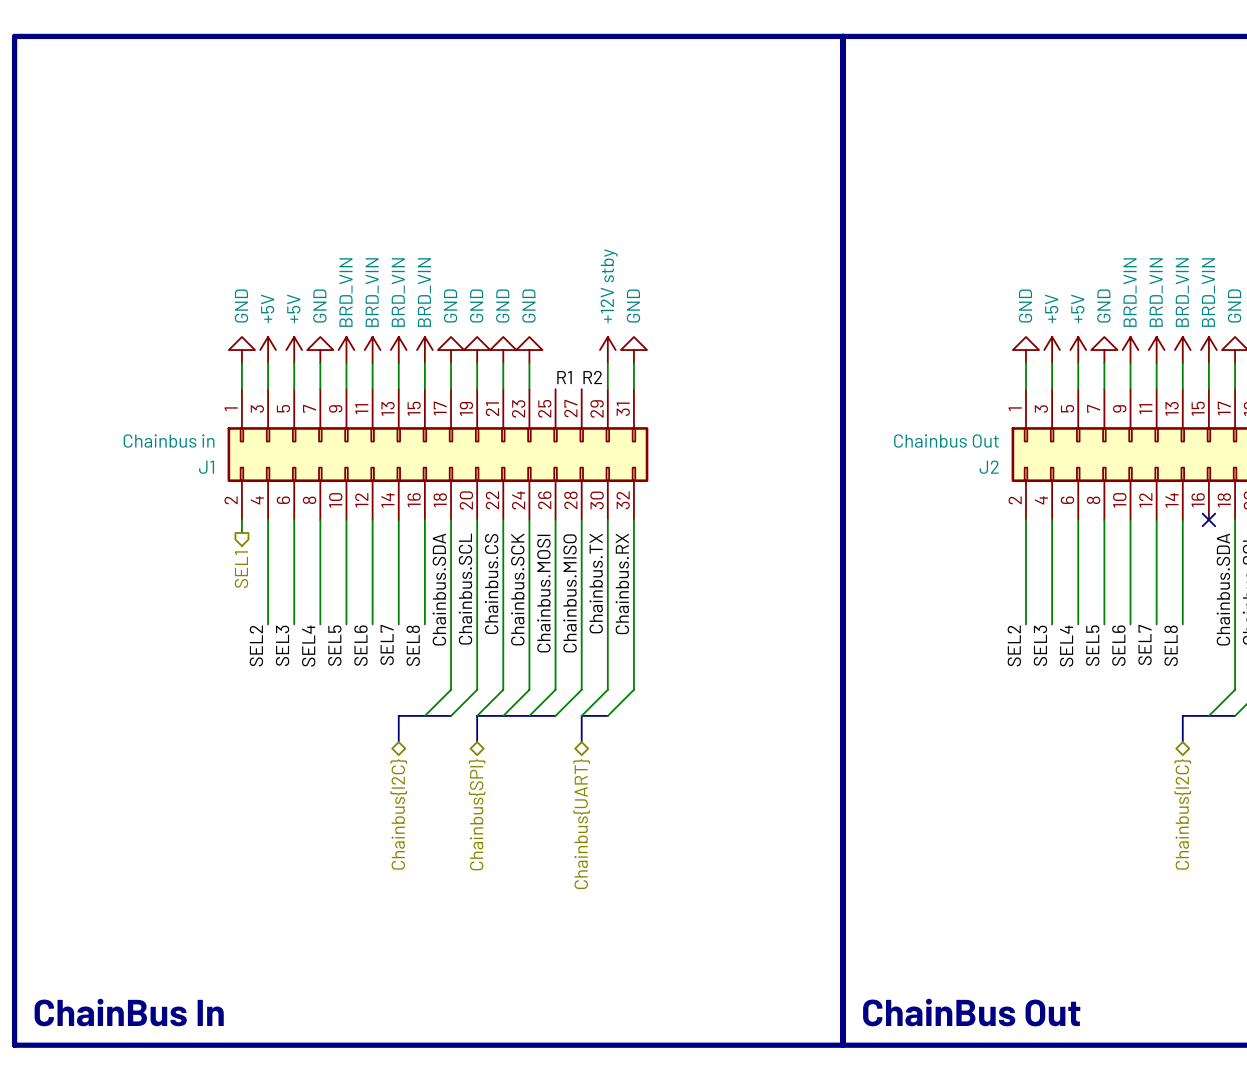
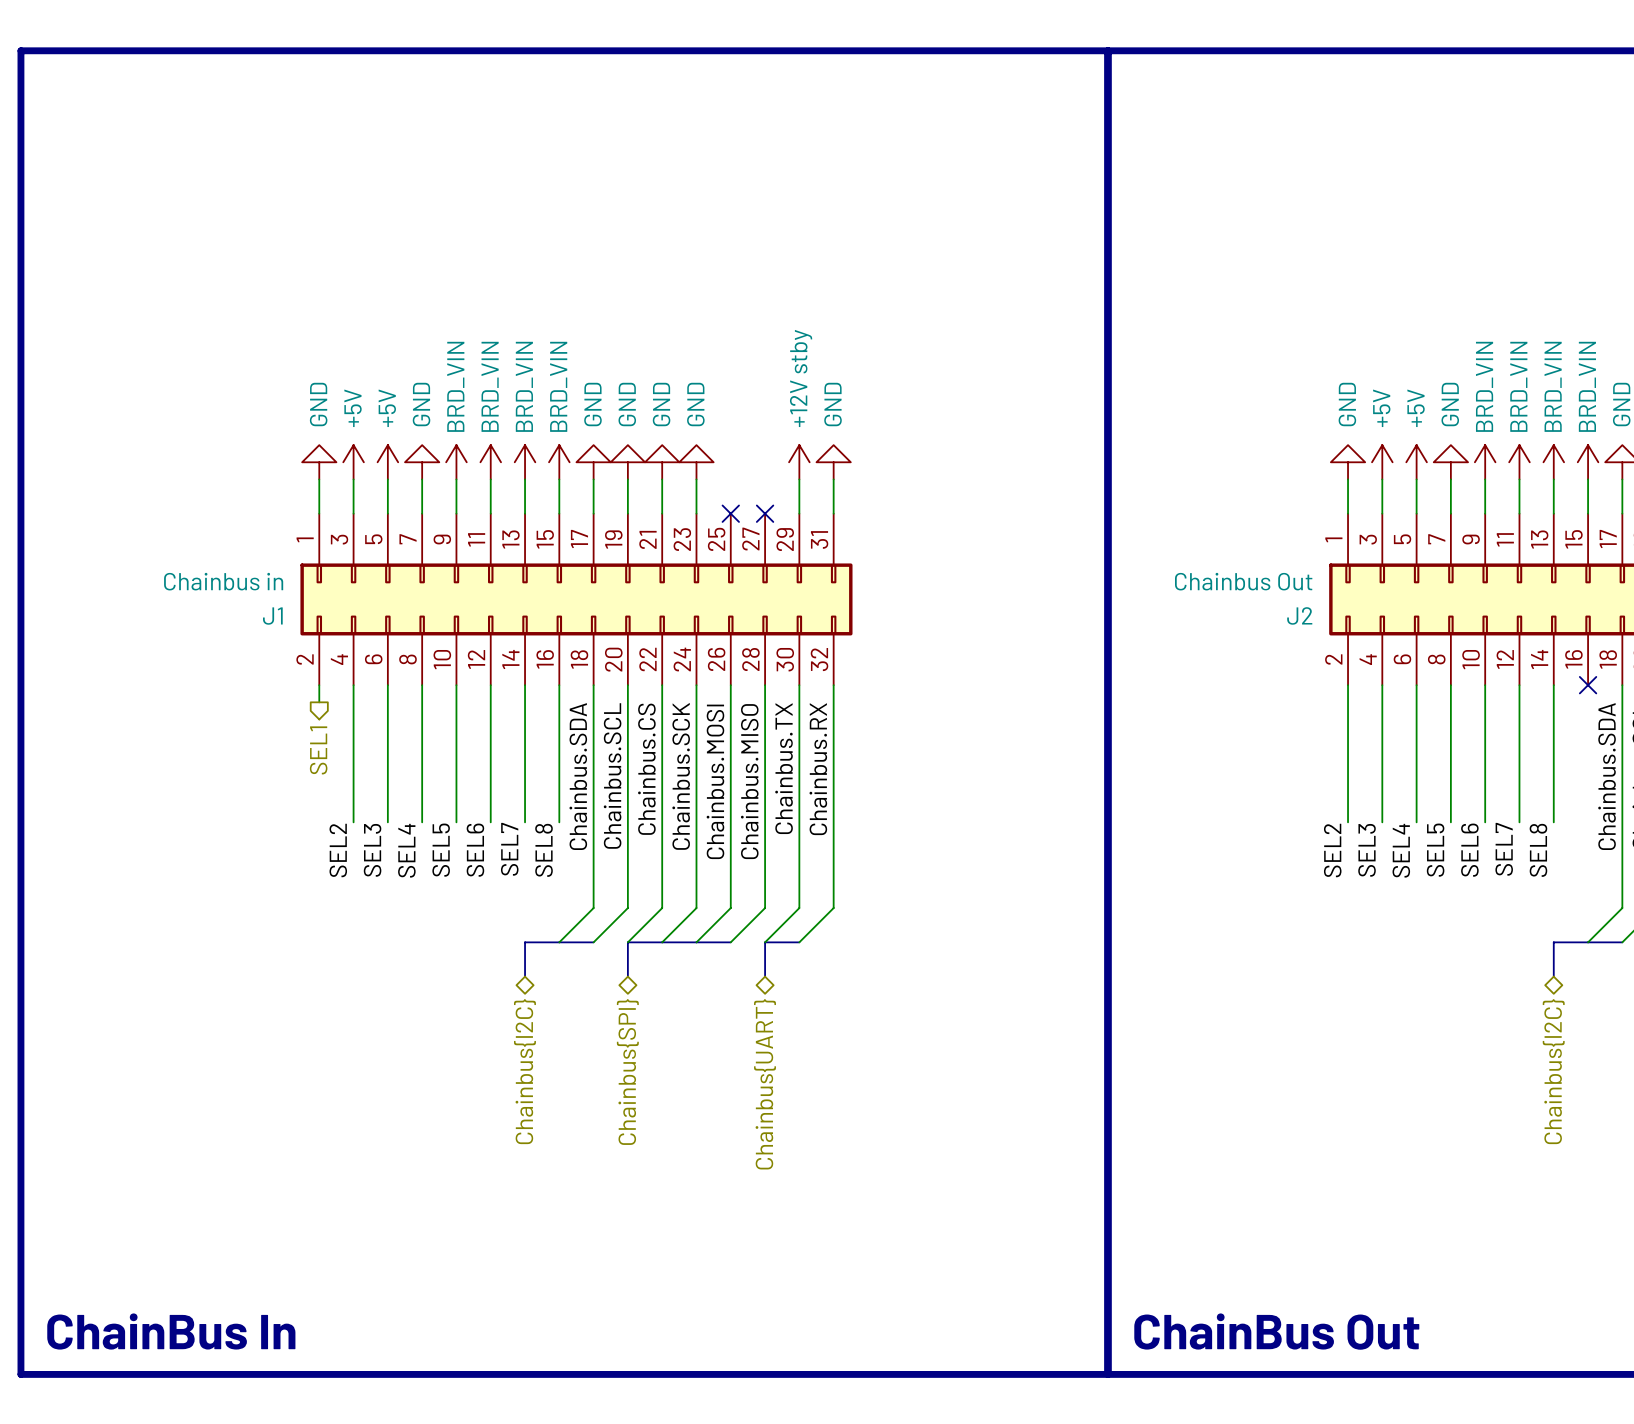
label: R1 (564, 377) -> none
label: R2 (592, 377) -> none
no-connect mark: none -> (730, 513)
no-connect mark: none -> (765, 513)

